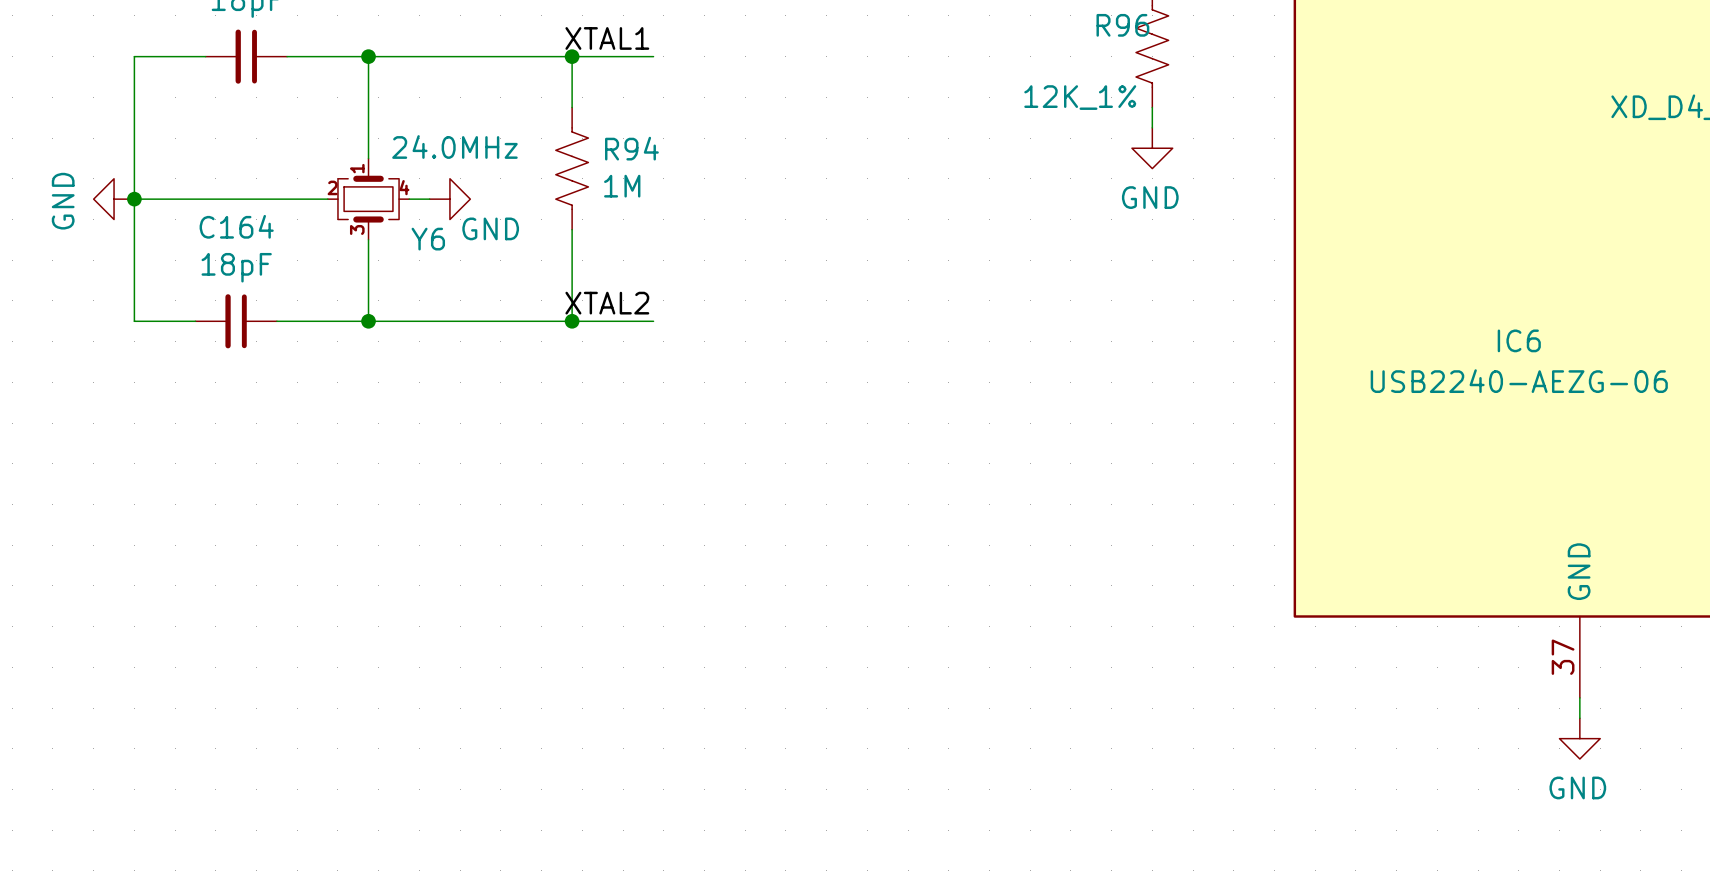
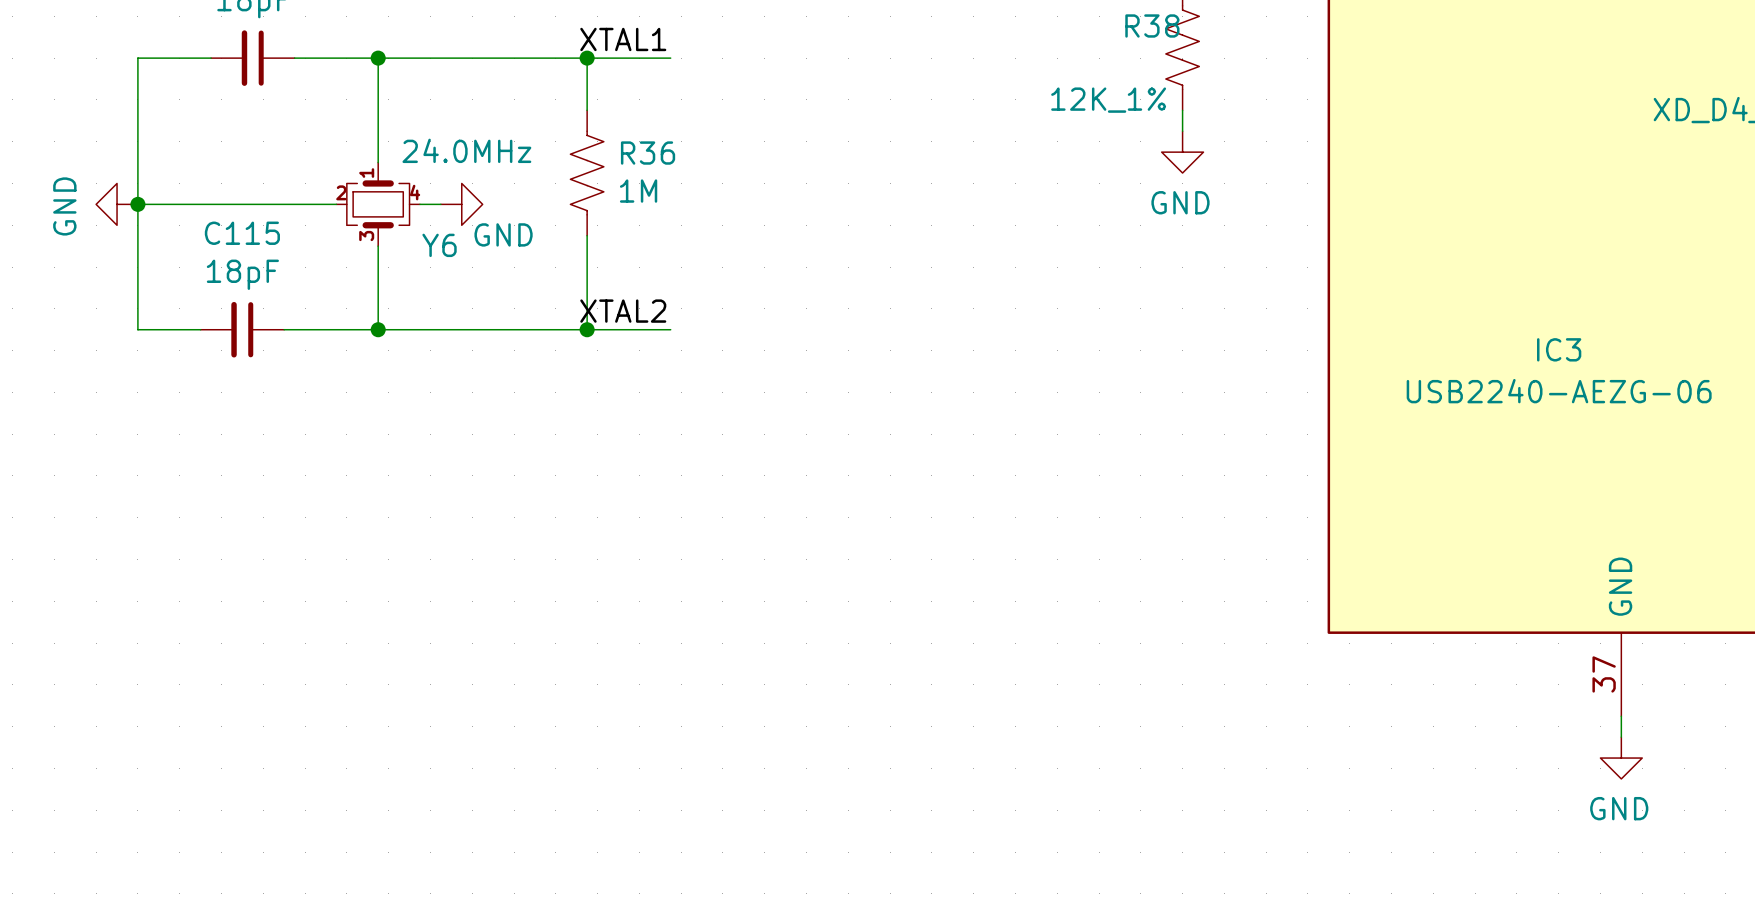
R96 name: R96 (1122, 25) -> R38 (1152, 25)
R94 name: R94 (631, 148) -> R36 (648, 153)
C164 name: C164 (236, 226) -> C115 (242, 233)
IC6 name: IC6 (1519, 340) -> IC3 (1559, 349)

